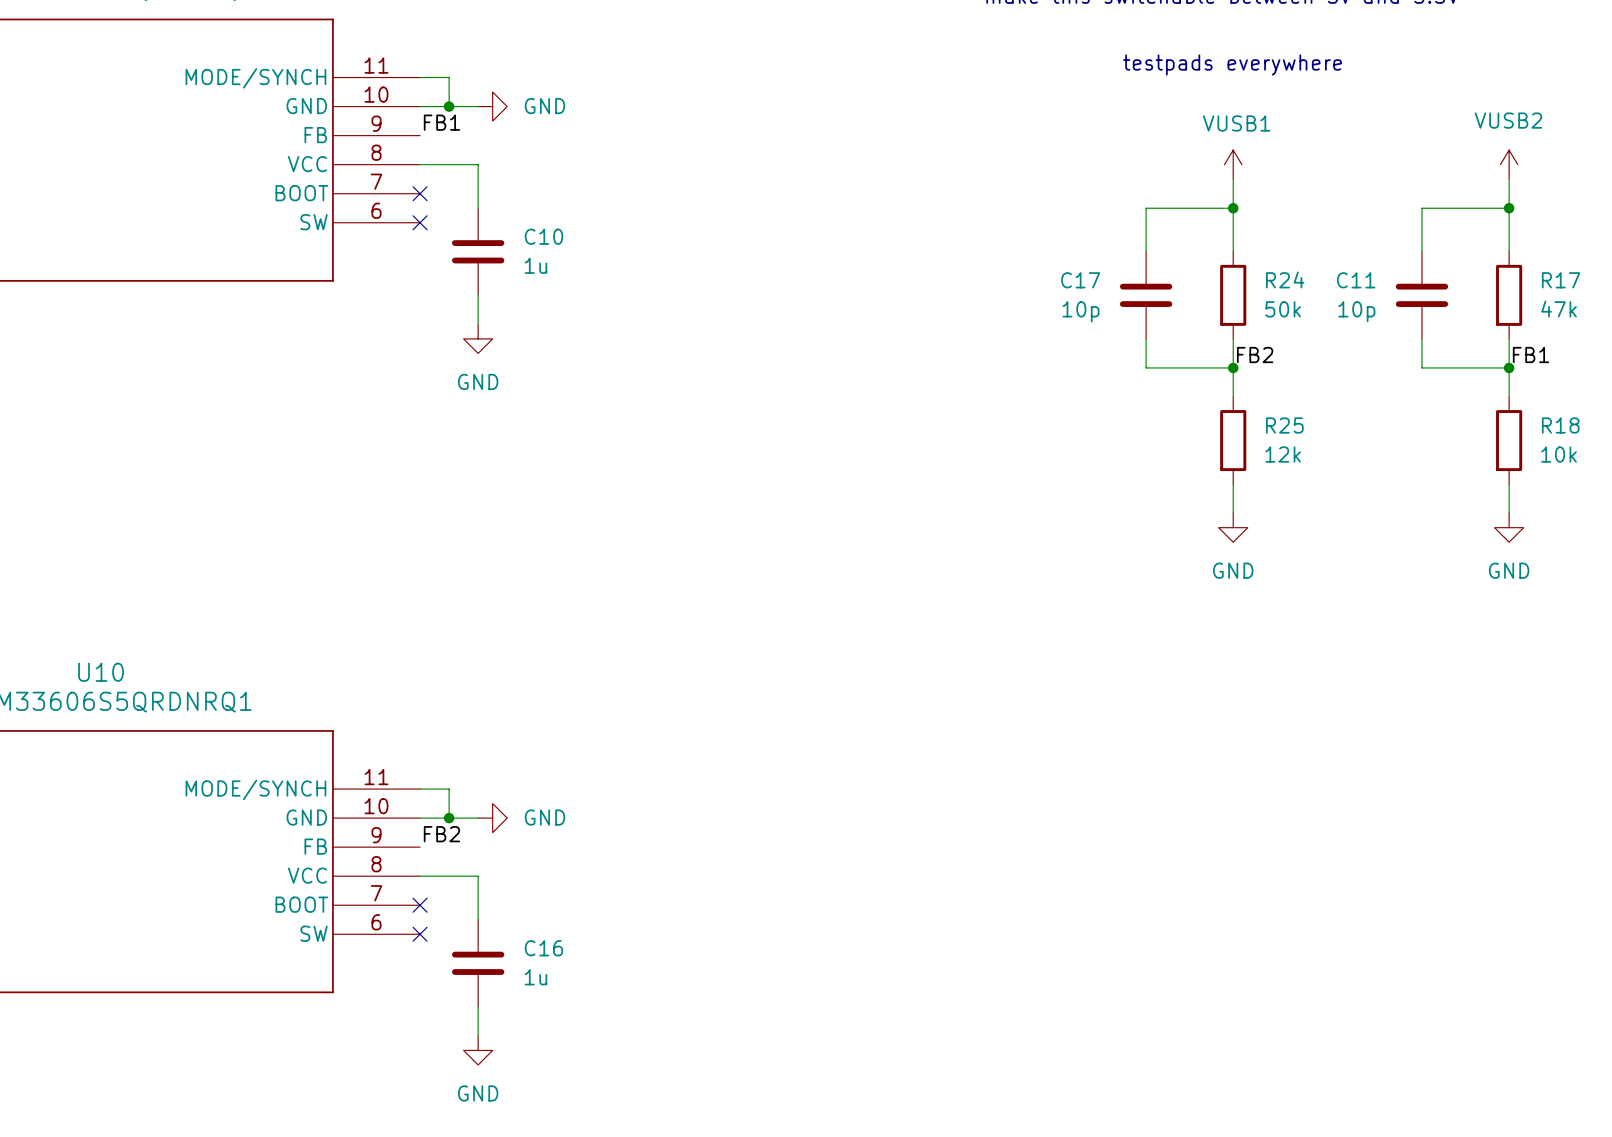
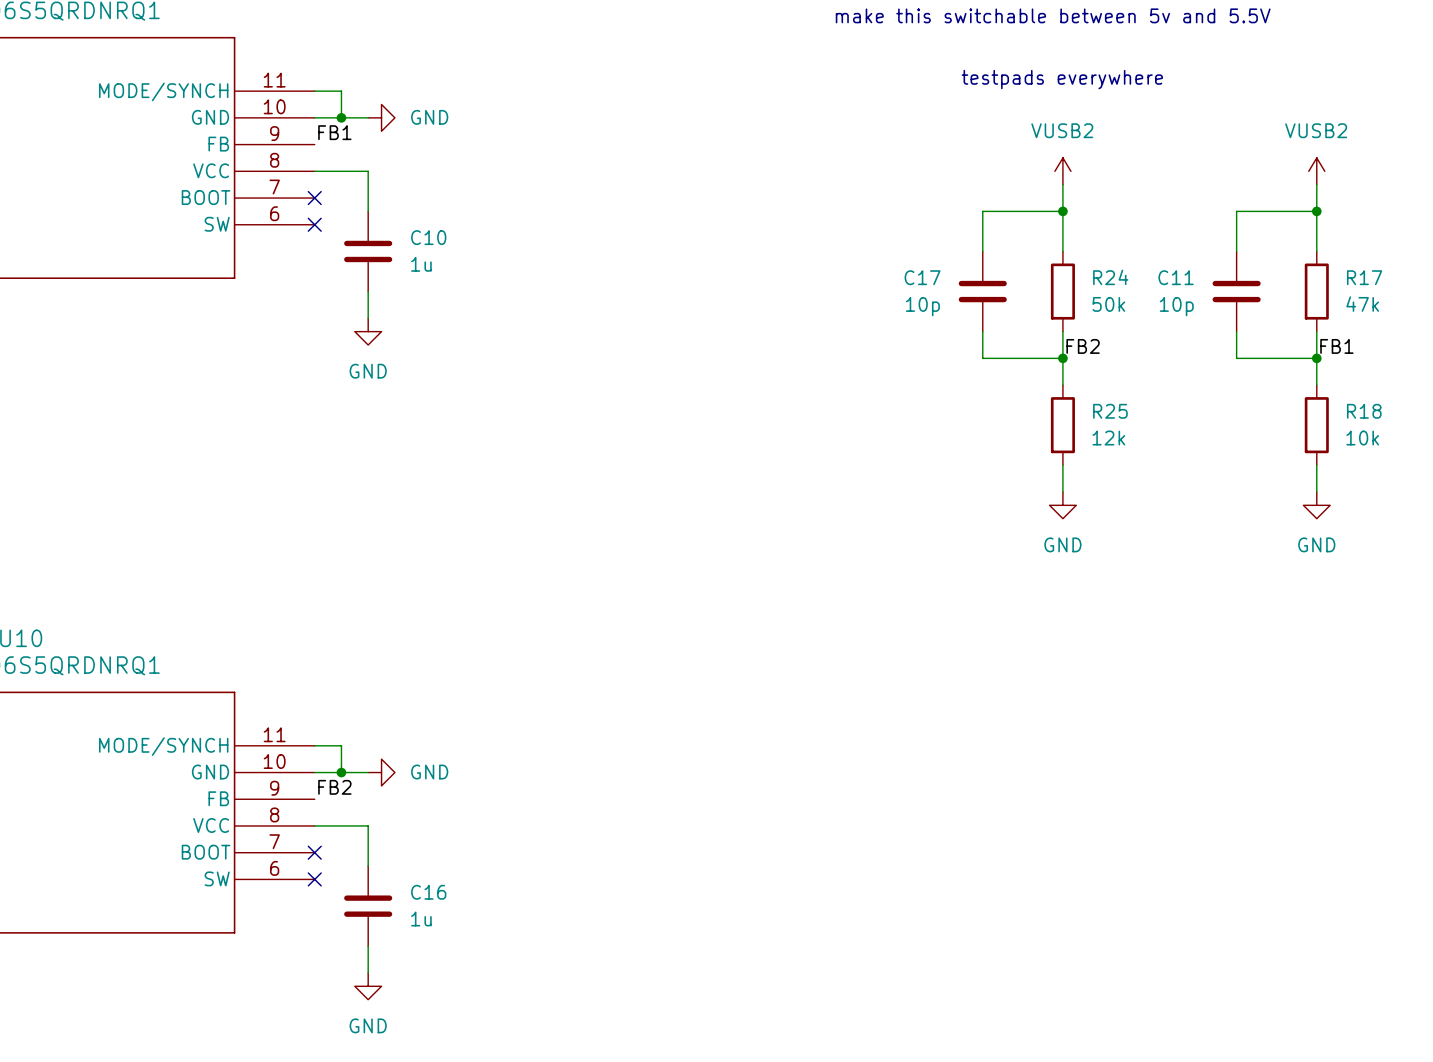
power symbol: VUSB1 (1233, 164) -> VUSB2 (1062, 171)

